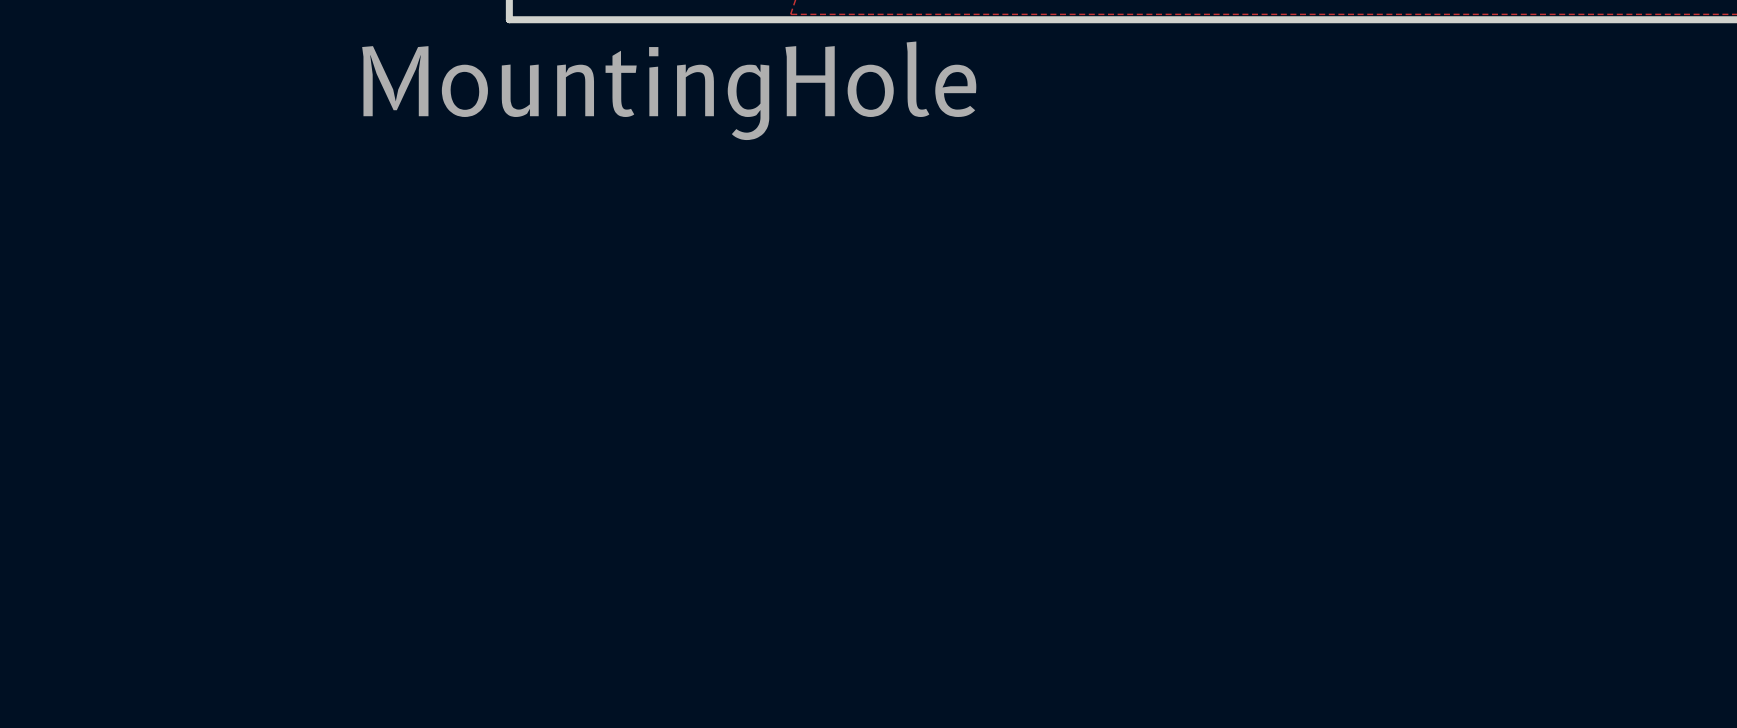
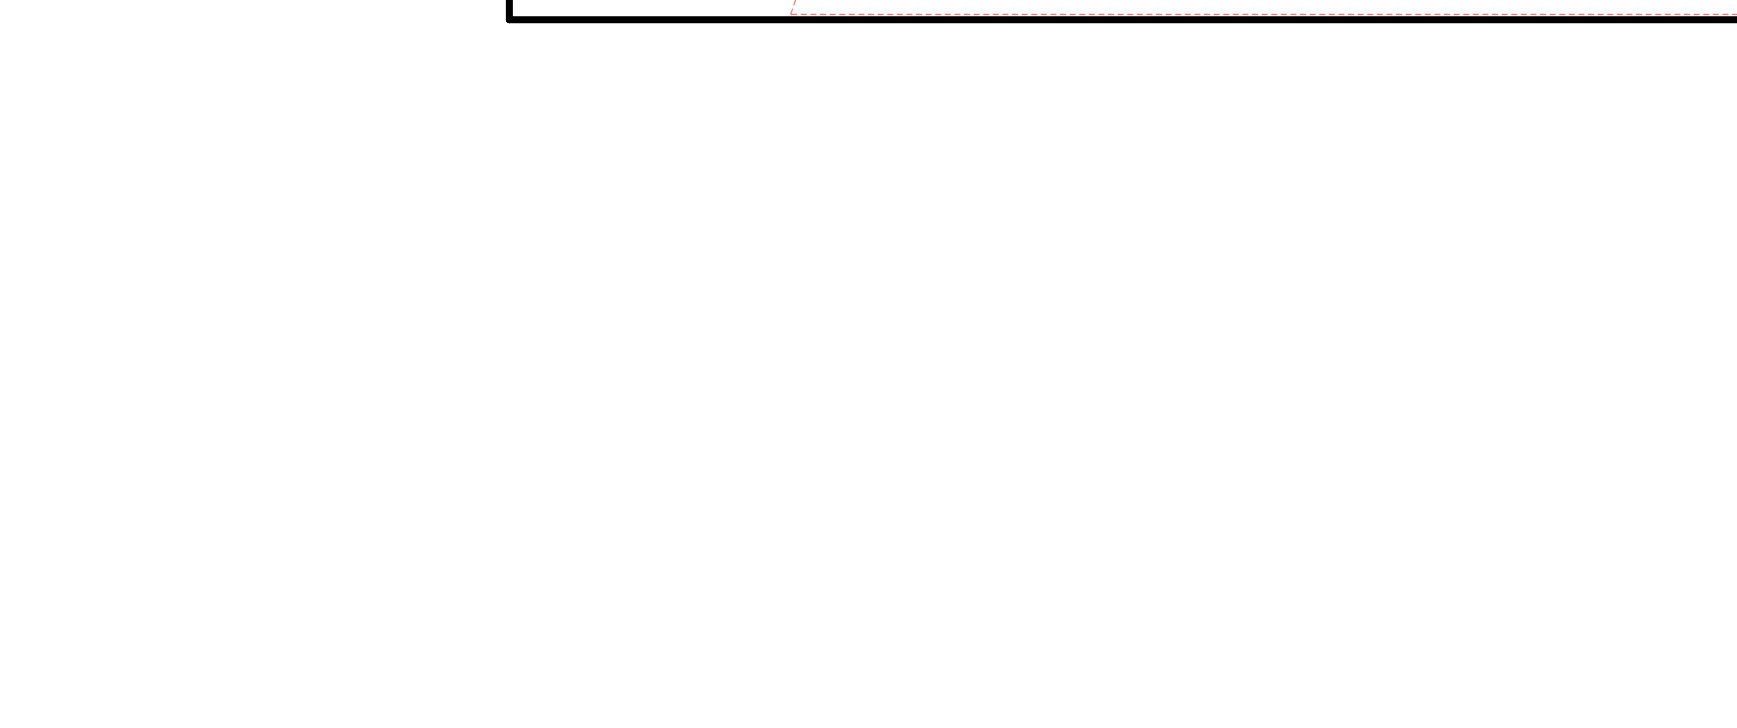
part value: MountingHole (669, 90) -> none

